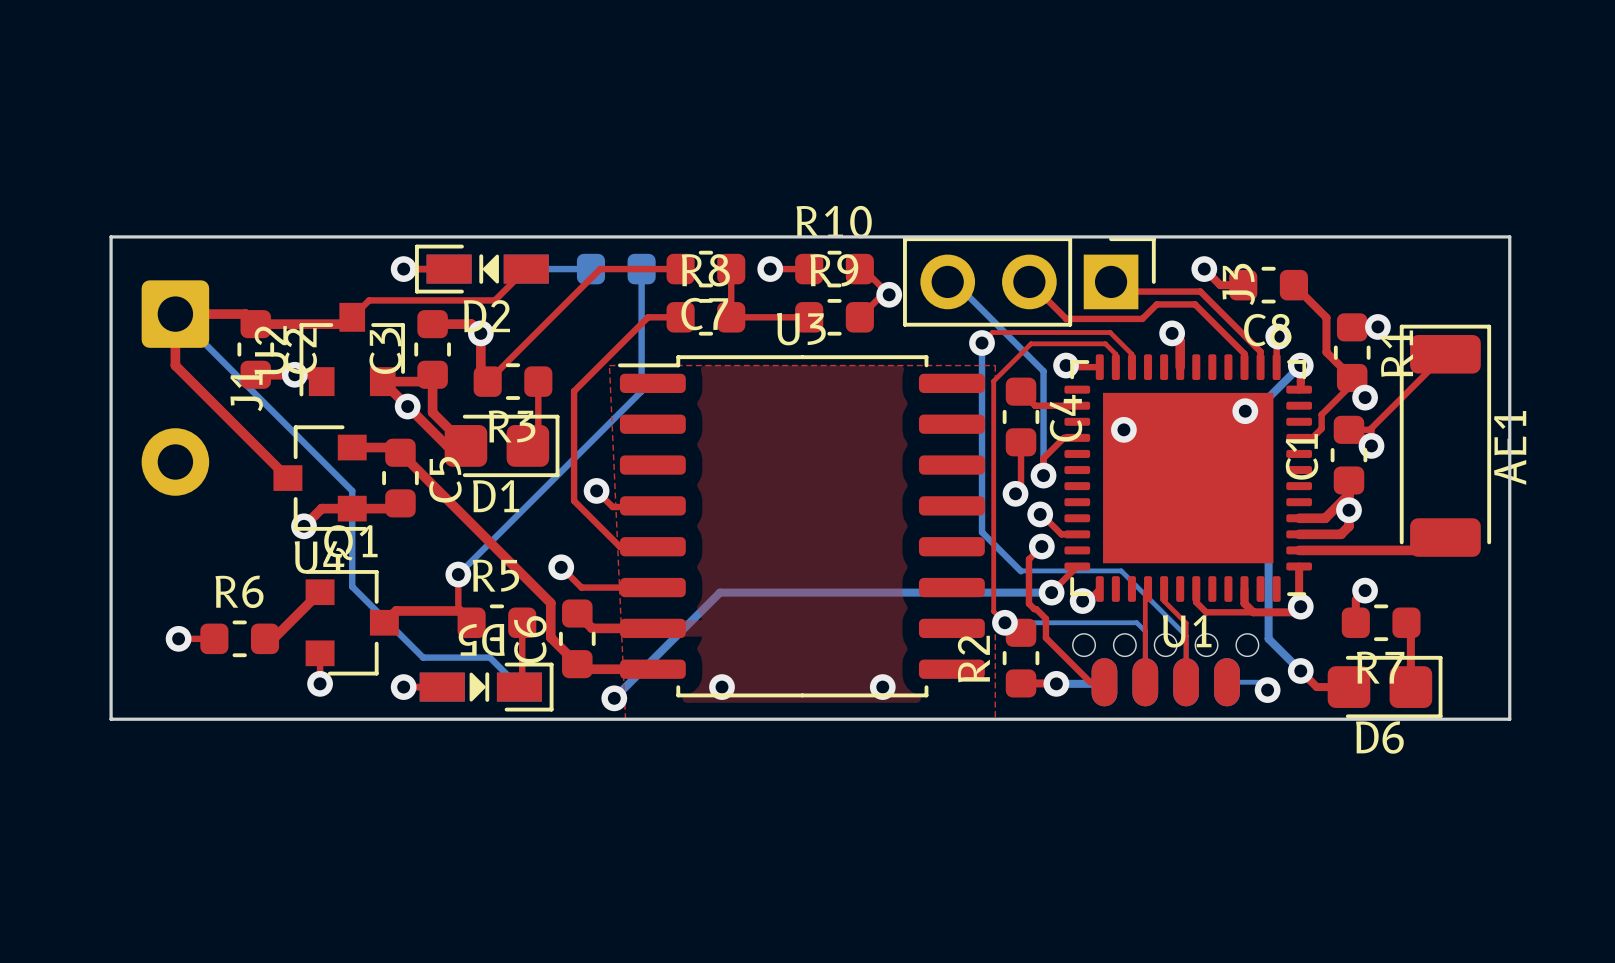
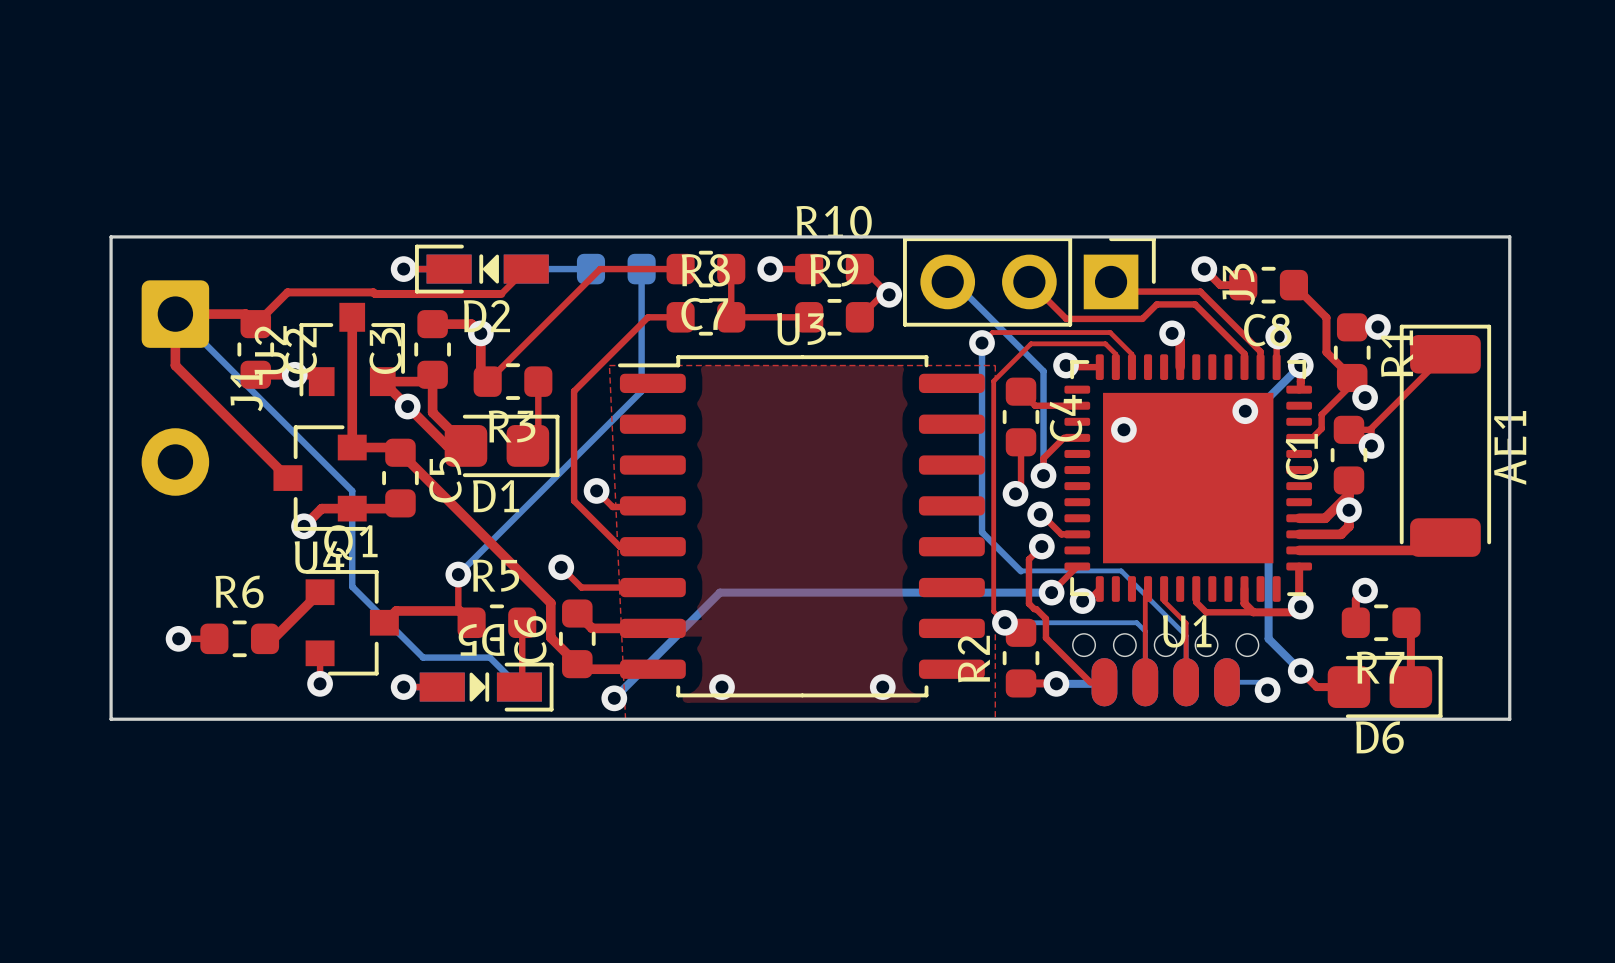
top track: (501, 293) (494, 300) (369, 300) (345, 324) (255, 324) -> (501, 293) (287, 292) (255, 324)
top track: none -> (352, 317) (352, 447)

